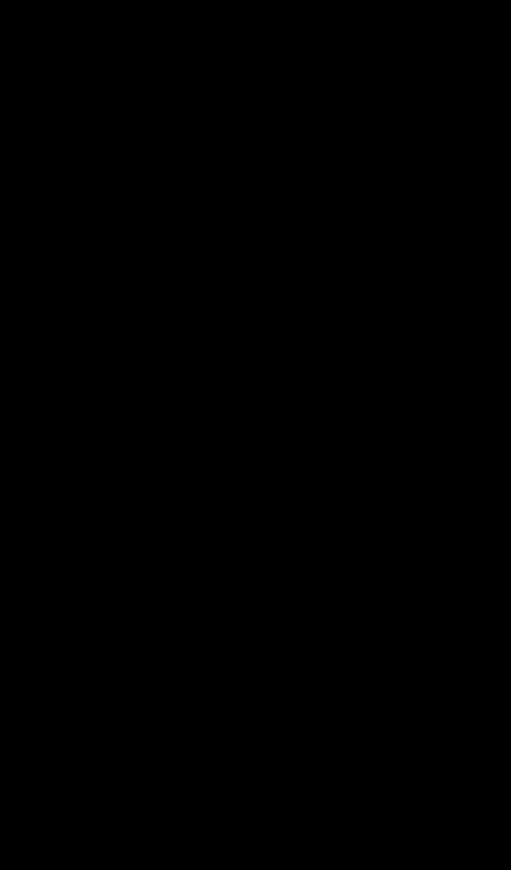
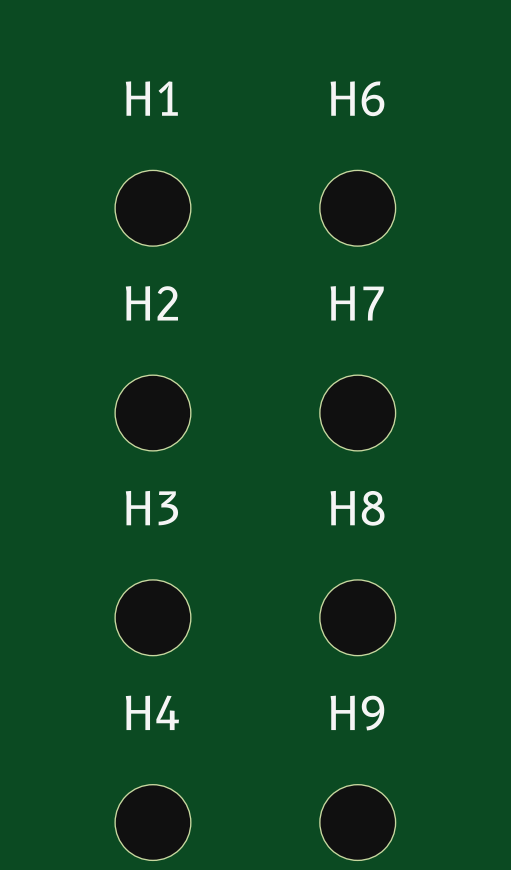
H1: none -> (152, 208)
H6: none -> (357, 208)
H2: none -> (152, 413)
H7: none -> (357, 413)
H3: none -> (152, 617)
H8: none -> (357, 617)
H4: none -> (152, 822)
H9: none -> (357, 822)

